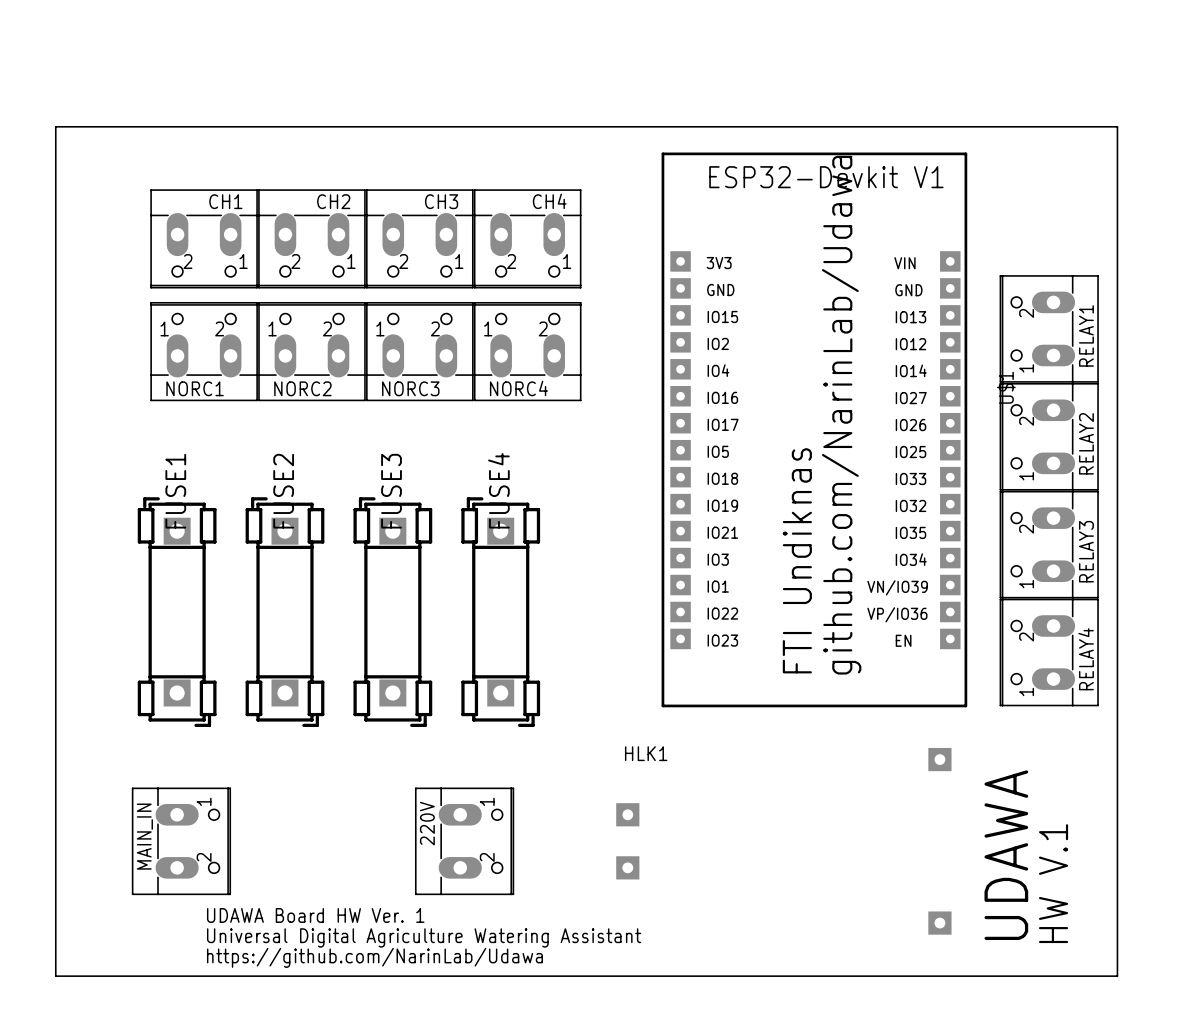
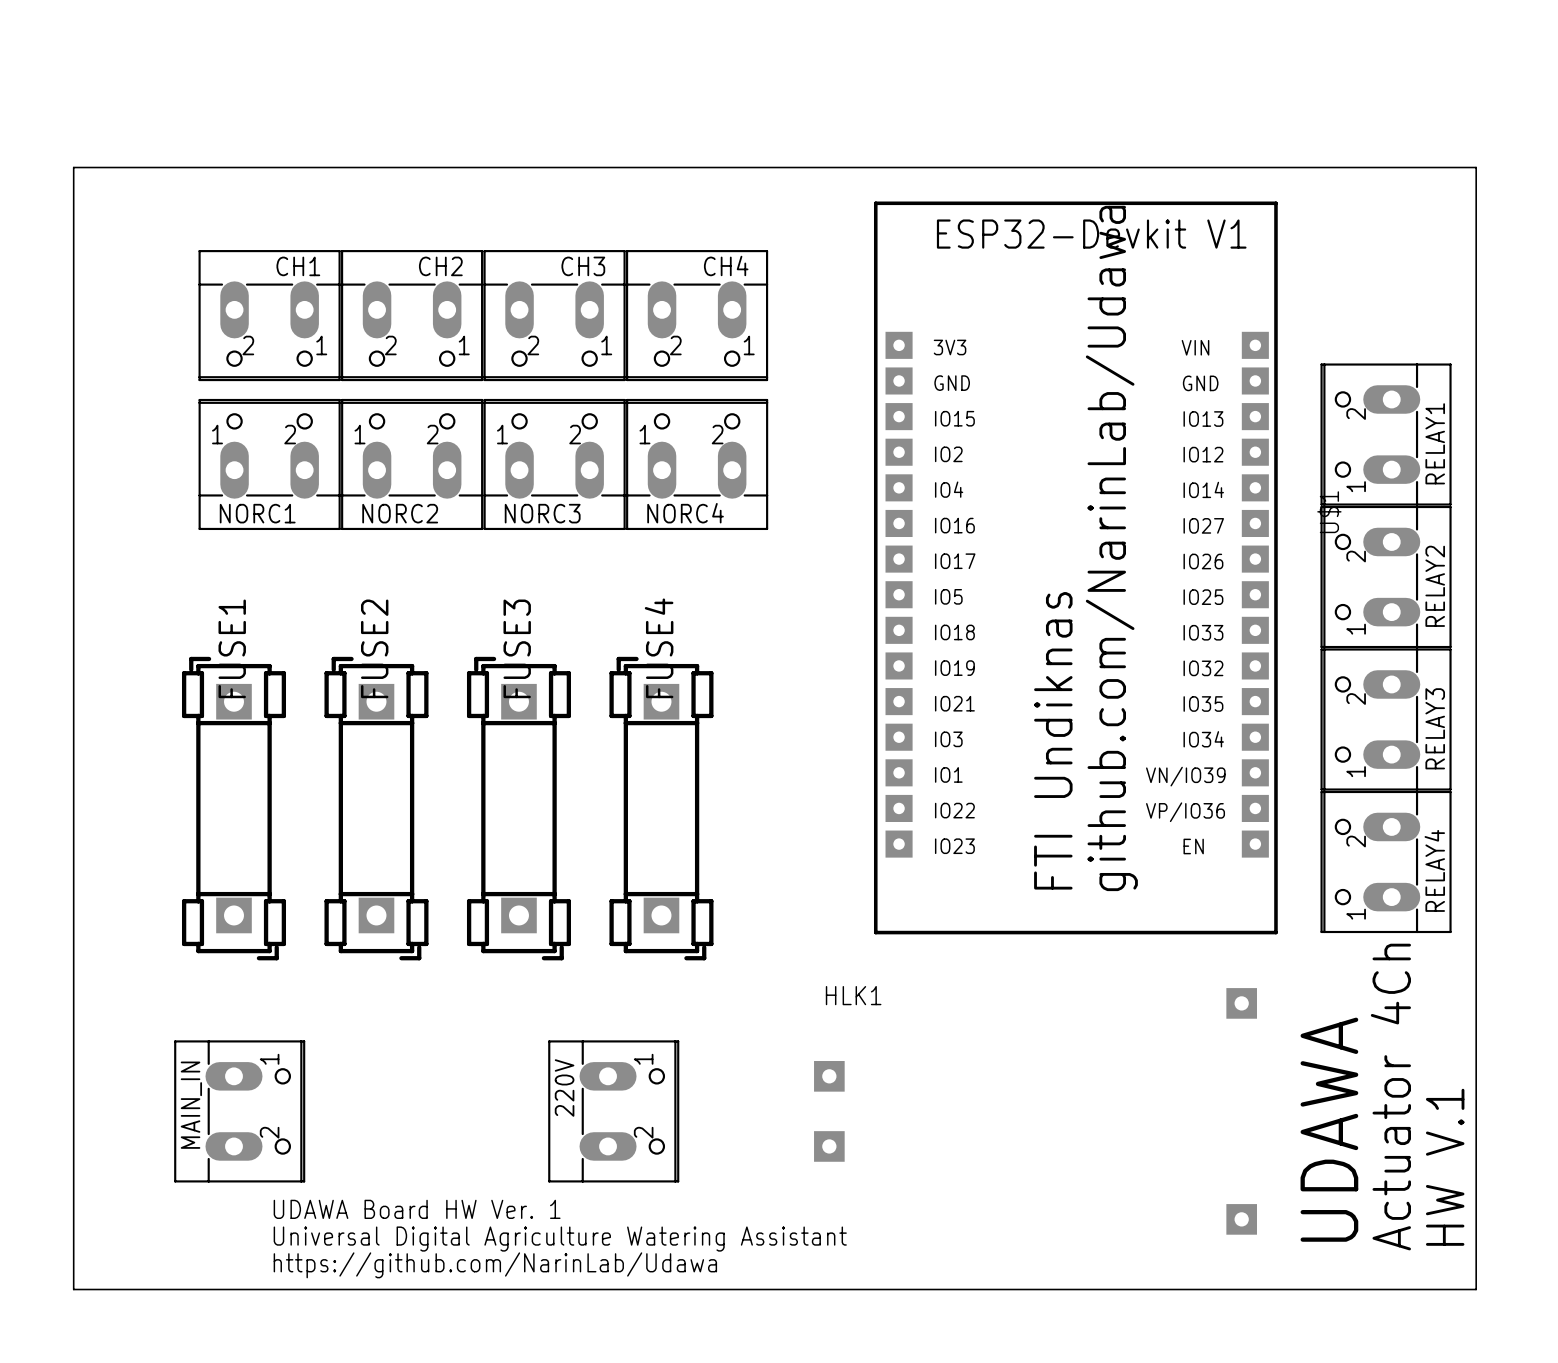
text: HW V.1 (1053, 883) -> Actuator 4Ch (1390, 1097)
text: none -> HW V.1 (1445, 1167)

